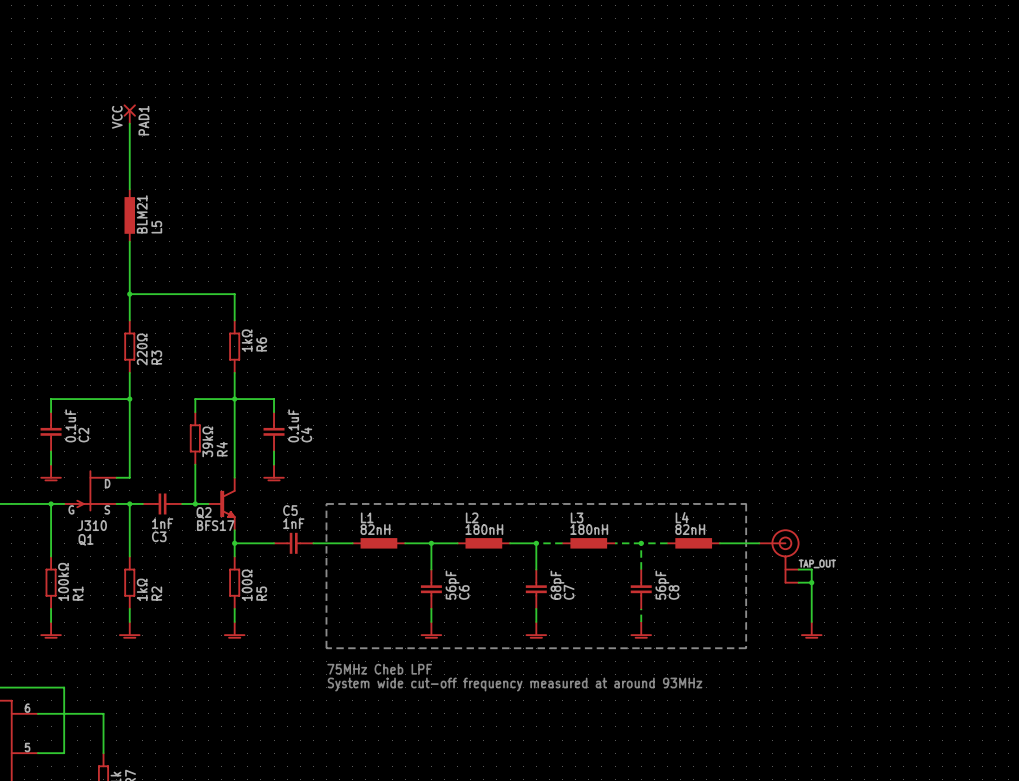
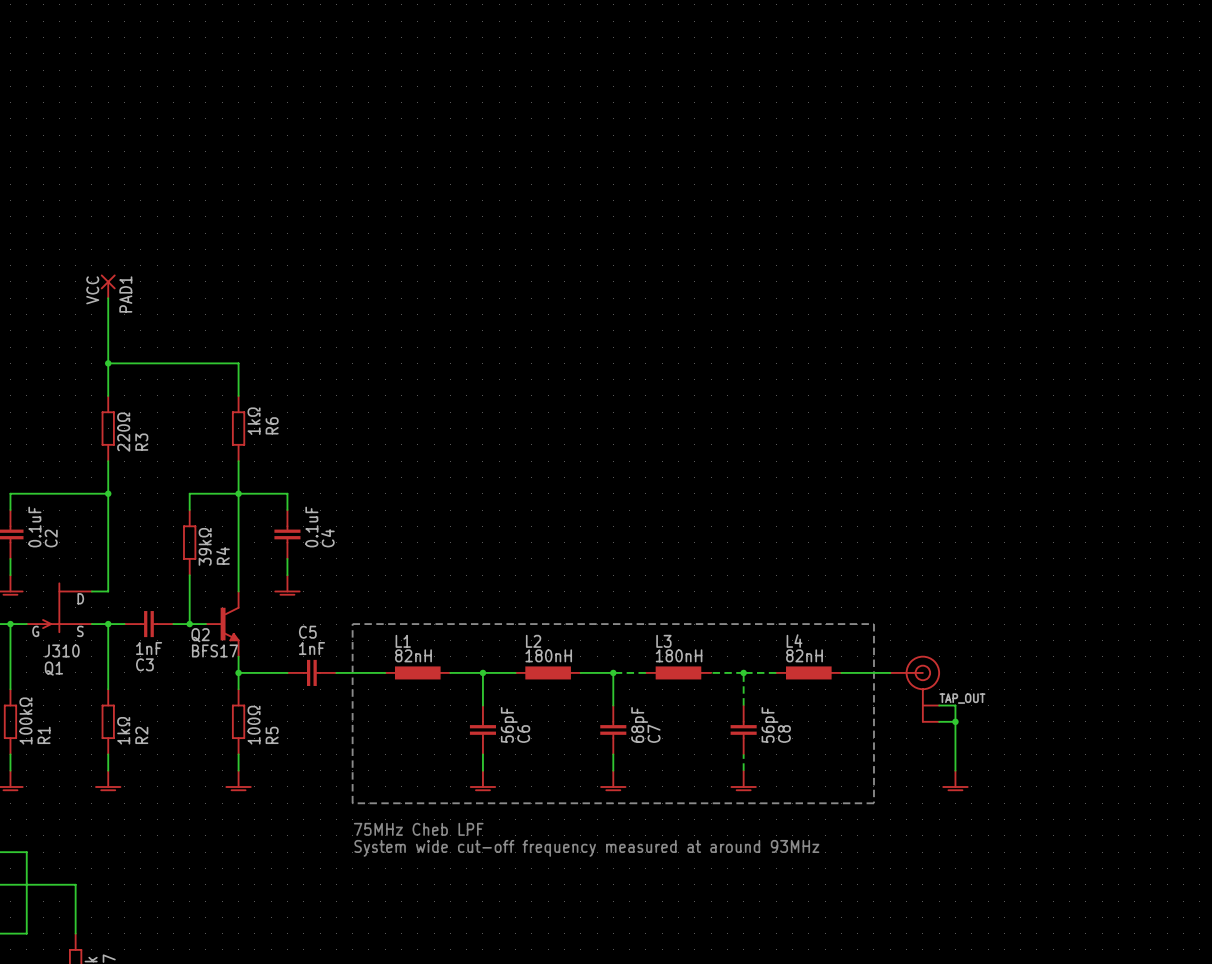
PAD1 position: (129, 114) -> (108, 286)
wire: (129, 123) (129, 189) -> none
L5: BLM21 (129, 215) -> none

